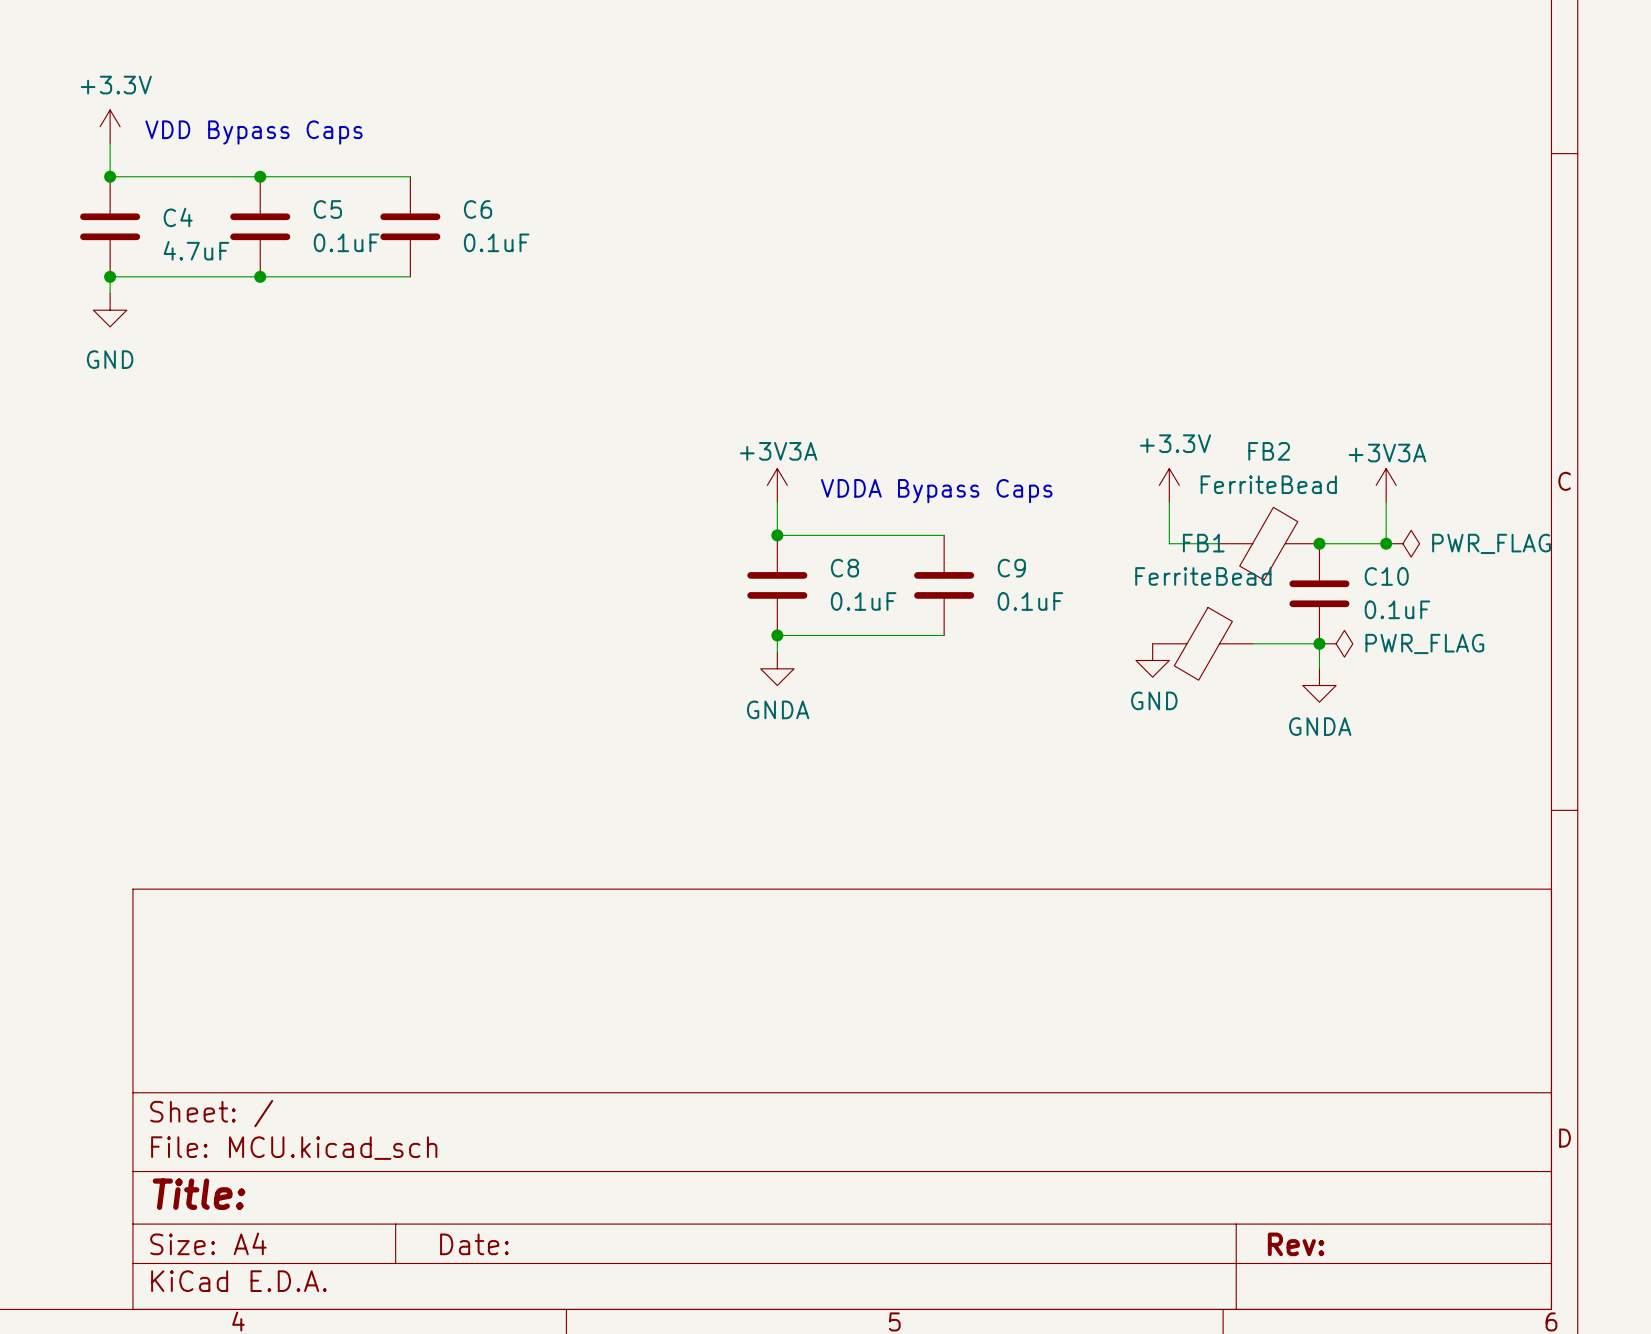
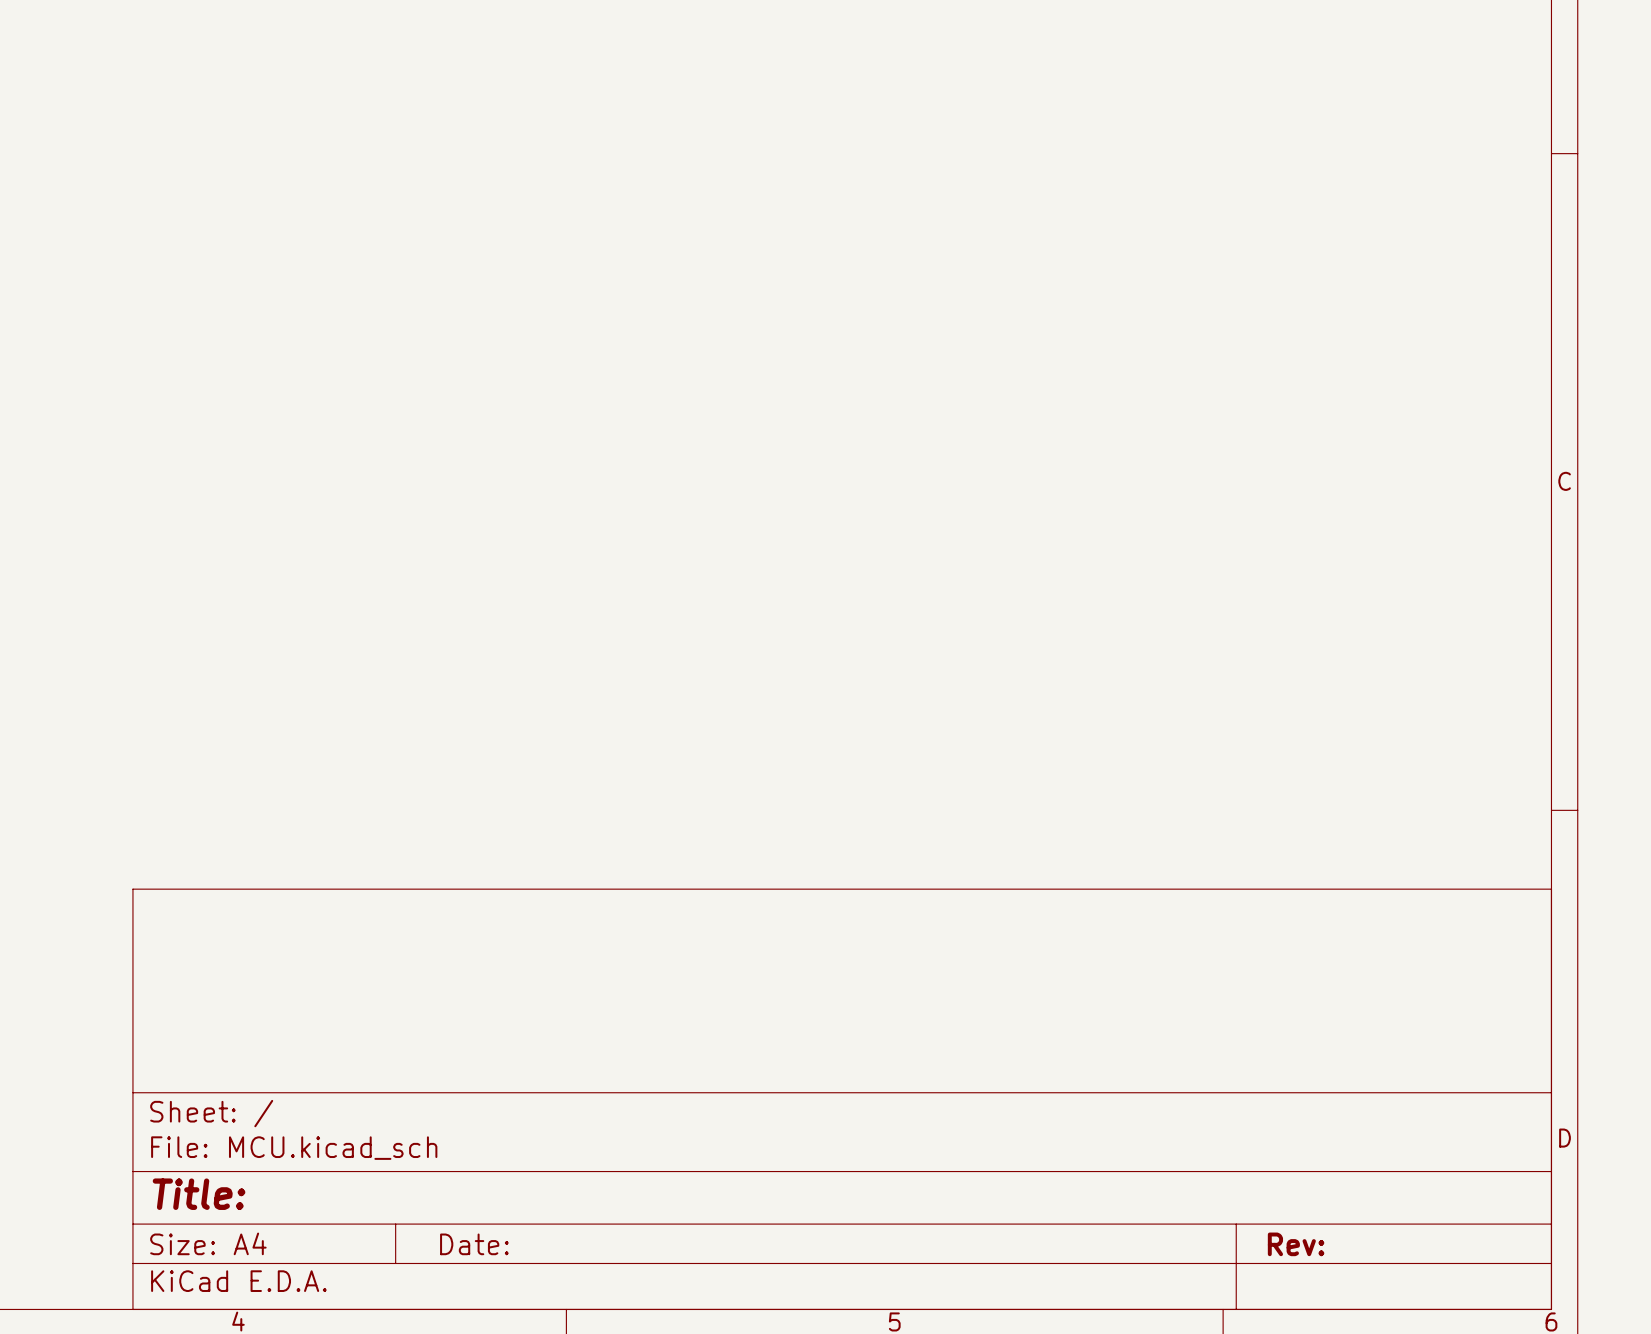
power symbol: +3.3V (110, 126) -> none
text: VDD Bypass Caps (254, 132) -> none
wire: (110, 143) (110, 176) (410, 176) -> none
junction: (110, 176) -> none
junction: (260, 176) -> none
C4: 4.7uF (110, 226) -> none
C5: 0.1uF (260, 226) -> none
C6: 0.1uF (410, 226) -> none
junction: (110, 276) -> none
junction: (260, 276) -> none
wire: (410, 276) (110, 276) (110, 293) -> none
power symbol: GND (110, 310) -> none
power symbol: +3V3A (777, 485) -> none
power symbol: +3.3V (1169, 485) -> none
power symbol: +3V3A (1386, 485) -> none
text: VDDA Bypass Caps (936, 491) -> none
wire: (777, 502) (777, 535) (944, 535) -> none
wire: (1169, 502) (1169, 543) (1219, 543) -> none
wire: (1386, 502) (1386, 543) (1319, 543) -> none
junction: (777, 535) -> none
FB2: FerriteBead (1269, 543) -> none
junction: (1319, 543) -> none
junction: (1386, 543) -> none
power symbol: PWR_FLAG (1402, 543) -> none
C8: 0.1uF (777, 585) -> none
C9: 0.1uF (944, 585) -> none
C10: 0.1uF (1319, 593) -> none
junction: (777, 635) -> none
wire: (944, 635) (777, 635) (777, 652) -> none
FB1: FerriteBead (1202, 643) -> none
wire: (1252, 643) (1319, 643) (1319, 668) -> none
junction: (1319, 643) -> none
power symbol: PWR_FLAG (1336, 643) -> none
power symbol: GND (1152, 660) -> none
power symbol: GNDA (777, 668) -> none
power symbol: GNDA (1319, 685) -> none

